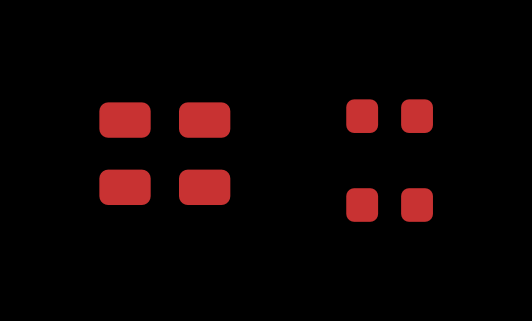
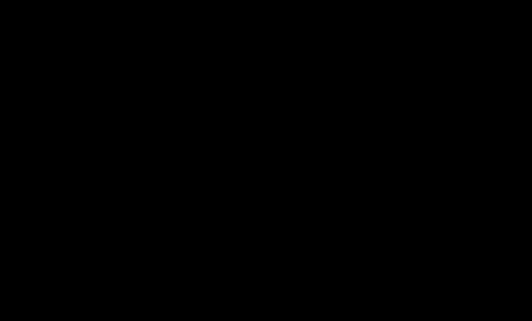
part: (389, 116) -> none
part: (125, 153) -> none
part: (204, 153) -> none
part: (389, 205) -> none

